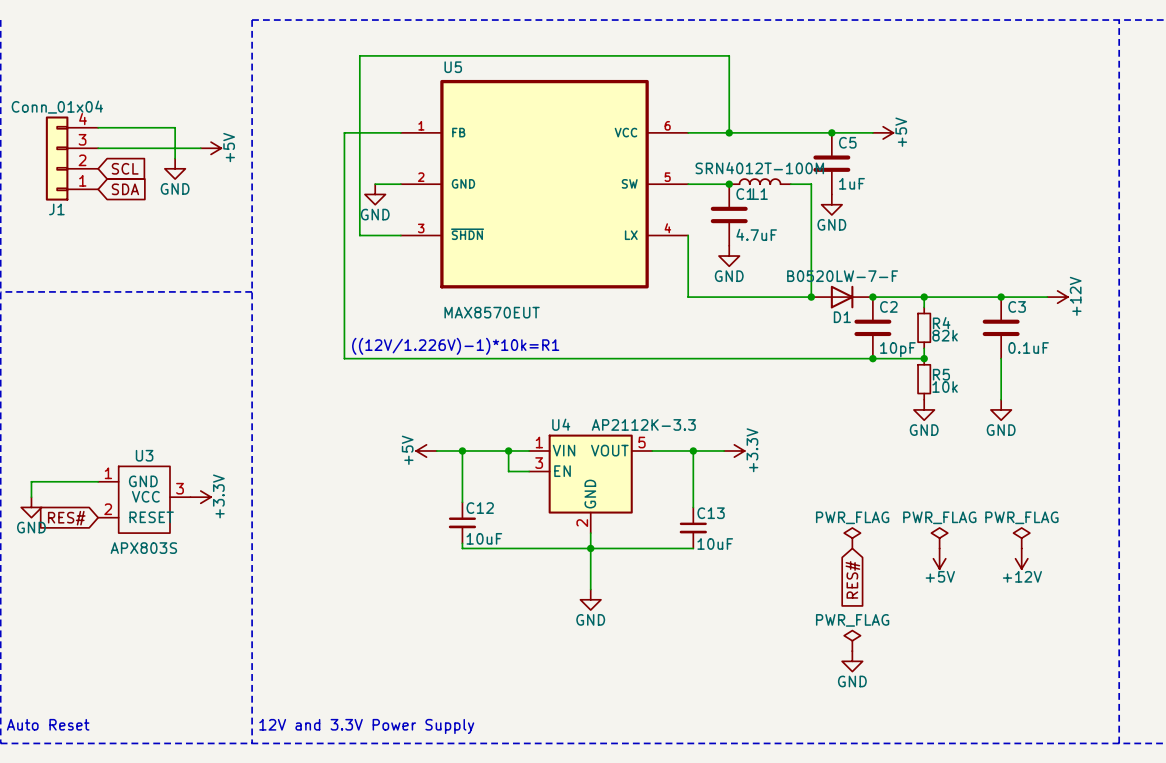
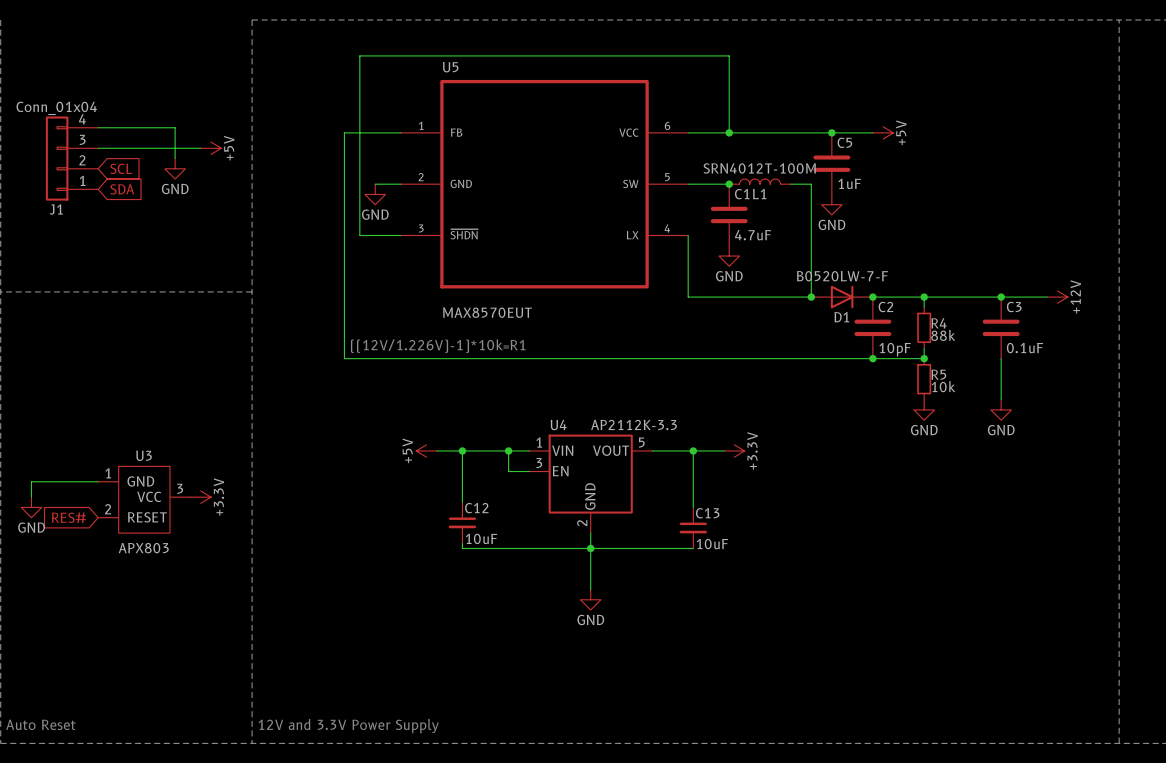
R4 value: 82k (945, 335) -> 88k (943, 335)
power symbol: PWR_FLAG (852, 538) -> none
power symbol: PWR_FLAG (939, 538) -> none
power symbol: PWR_FLAG (1021, 538) -> none
U3 value: APX803S (143, 548) -> APX803 (143, 548)
power symbol: +5V (939, 558) -> none
power symbol: +12V (1021, 558) -> none
global label: RES# (852, 579) -> none
power symbol: PWR_FLAG (852, 640) -> none
power symbol: GND (852, 661) -> none

